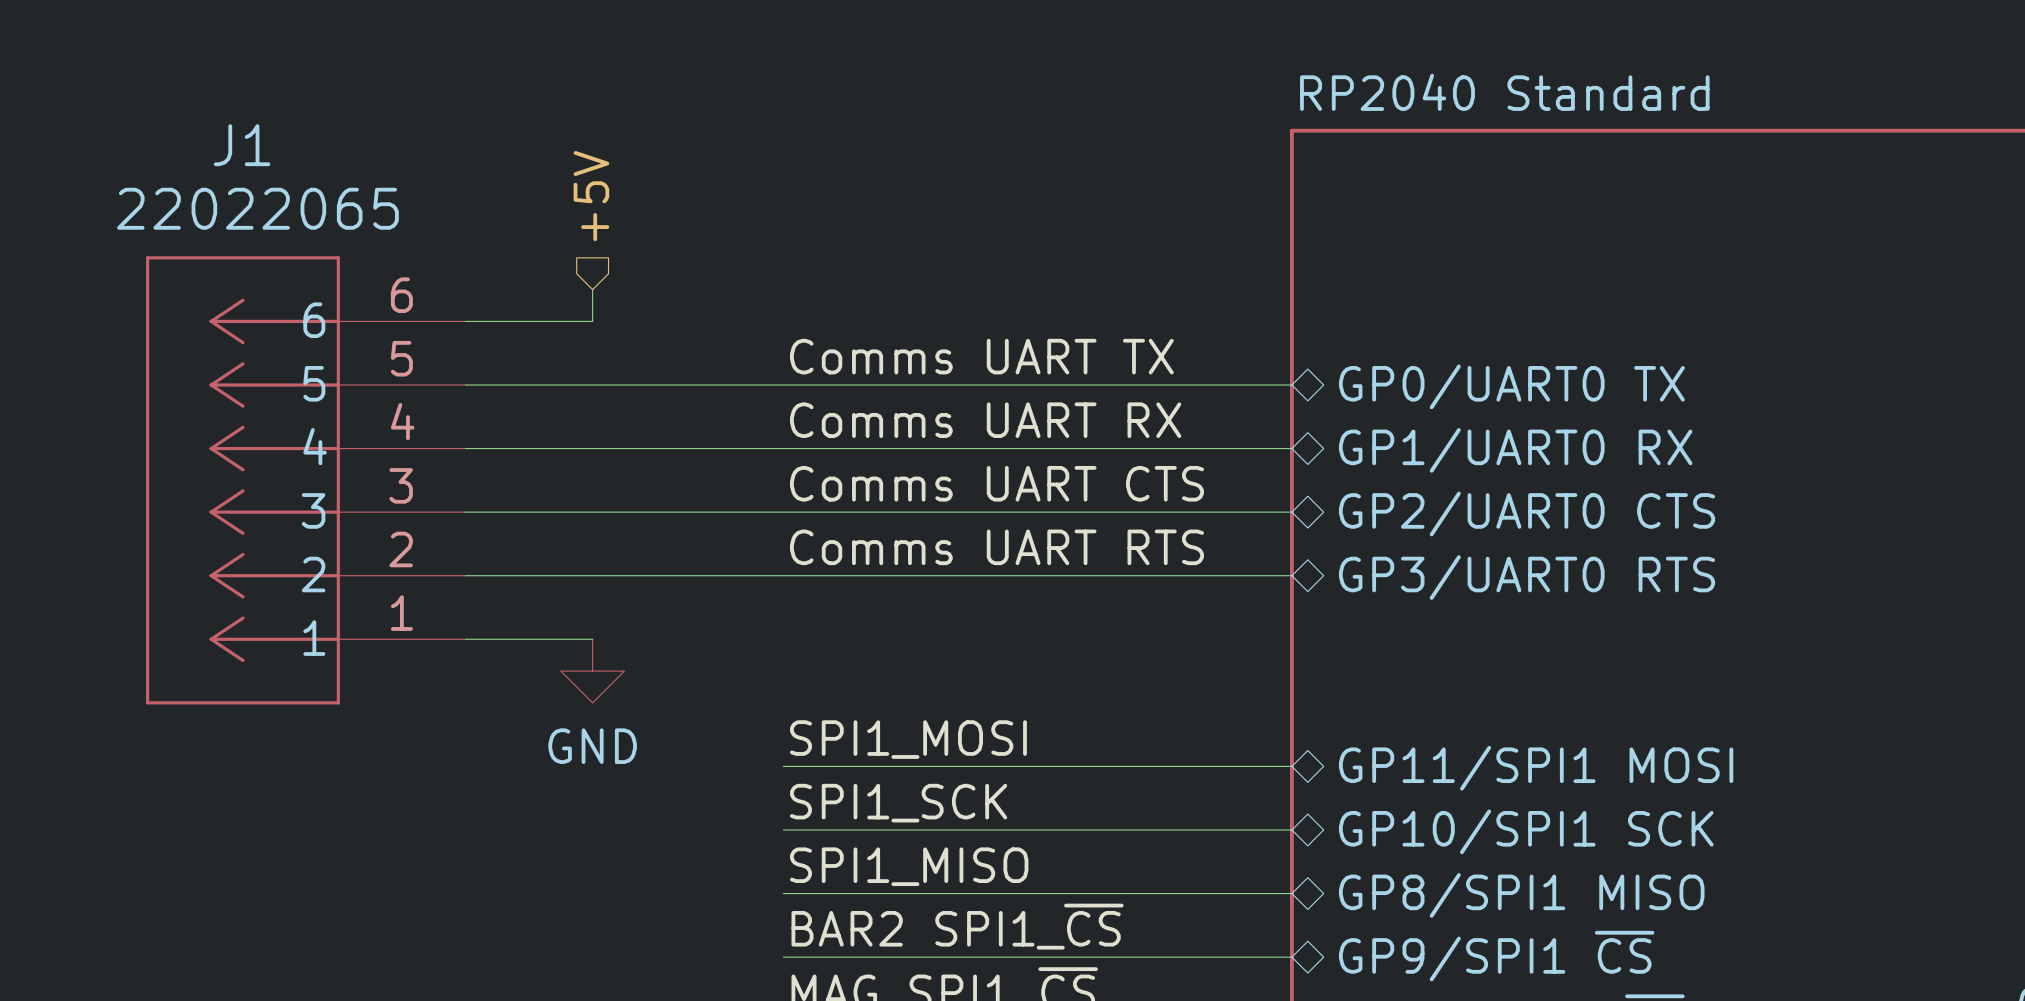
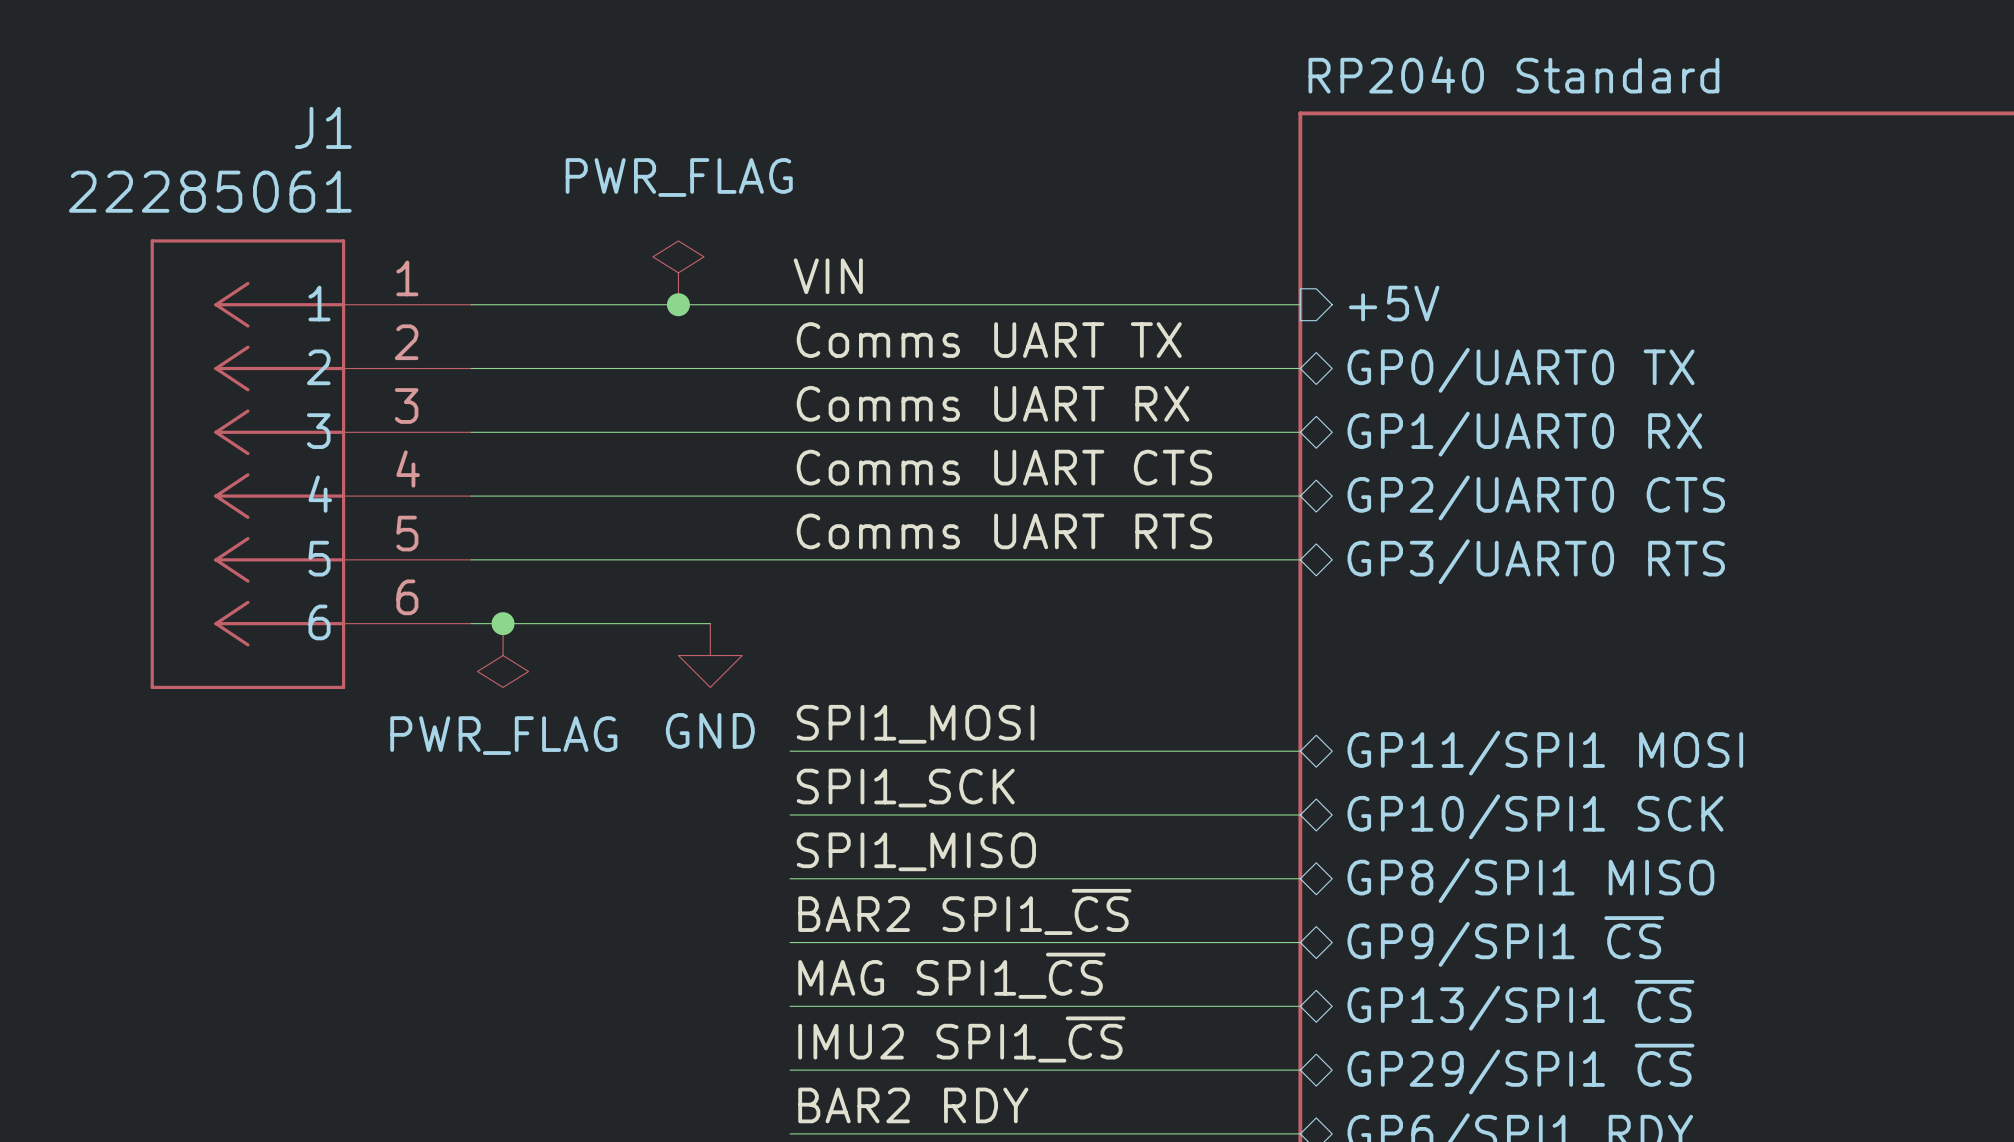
J1 name position: J1 (242, 145) -> J1 (323, 127)
hierarchical label: +5V (591, 196) -> none
J1 value: 22022065 (257, 208) -> 22285061 (210, 191)
wire: (592, 289) (592, 321) -> (1300, 304) (598, 304)
power symbol: none -> PWR_FLAG (678, 272)
label: none -> VIN (828, 276)
sheet pin: none -> +5V (1394, 303)
junction: none -> (678, 304)
J1 flip: as is (242, 480) -> up-down (247, 464)
junction: none -> (503, 623)
wire: none -> (598, 623) (710, 623)
power symbol: none -> PWR_FLAG (503, 655)
power symbol position: GND (592, 671) -> GND (710, 655)

